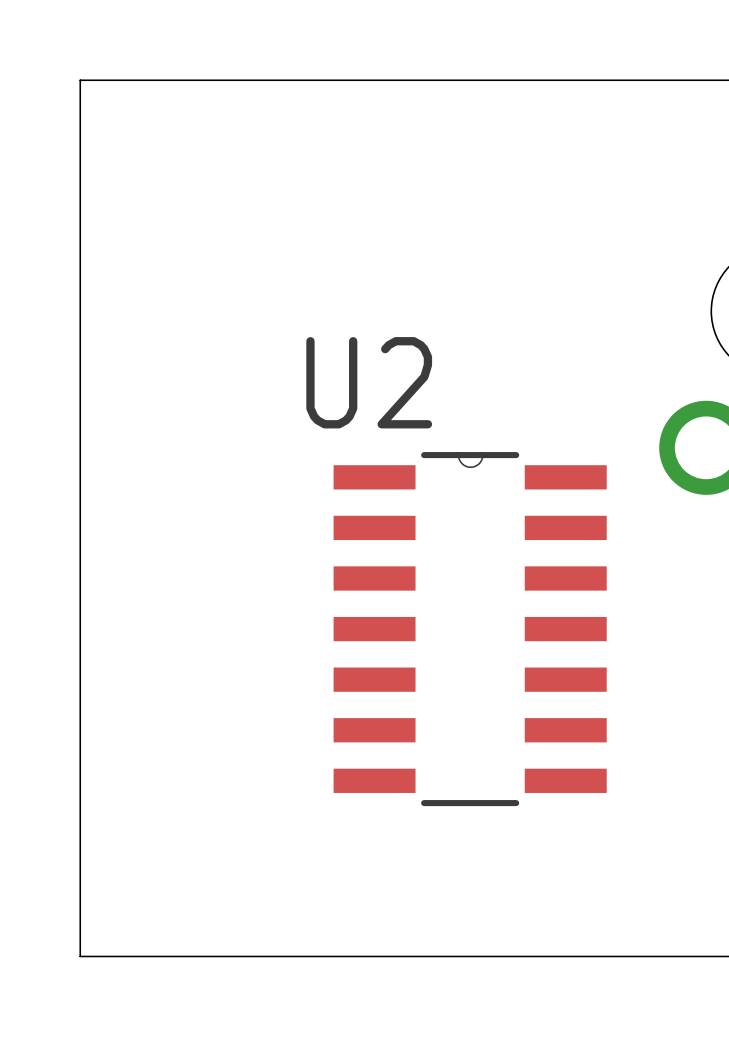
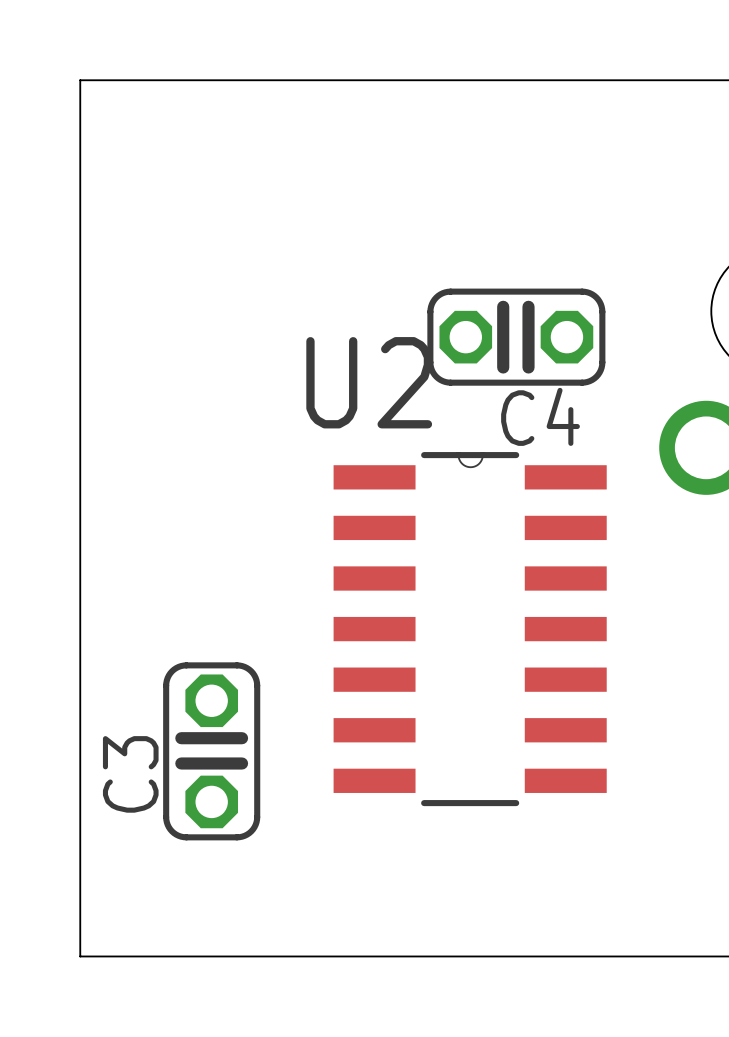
C4: none -> (516, 337)
C3: none -> (211, 751)

